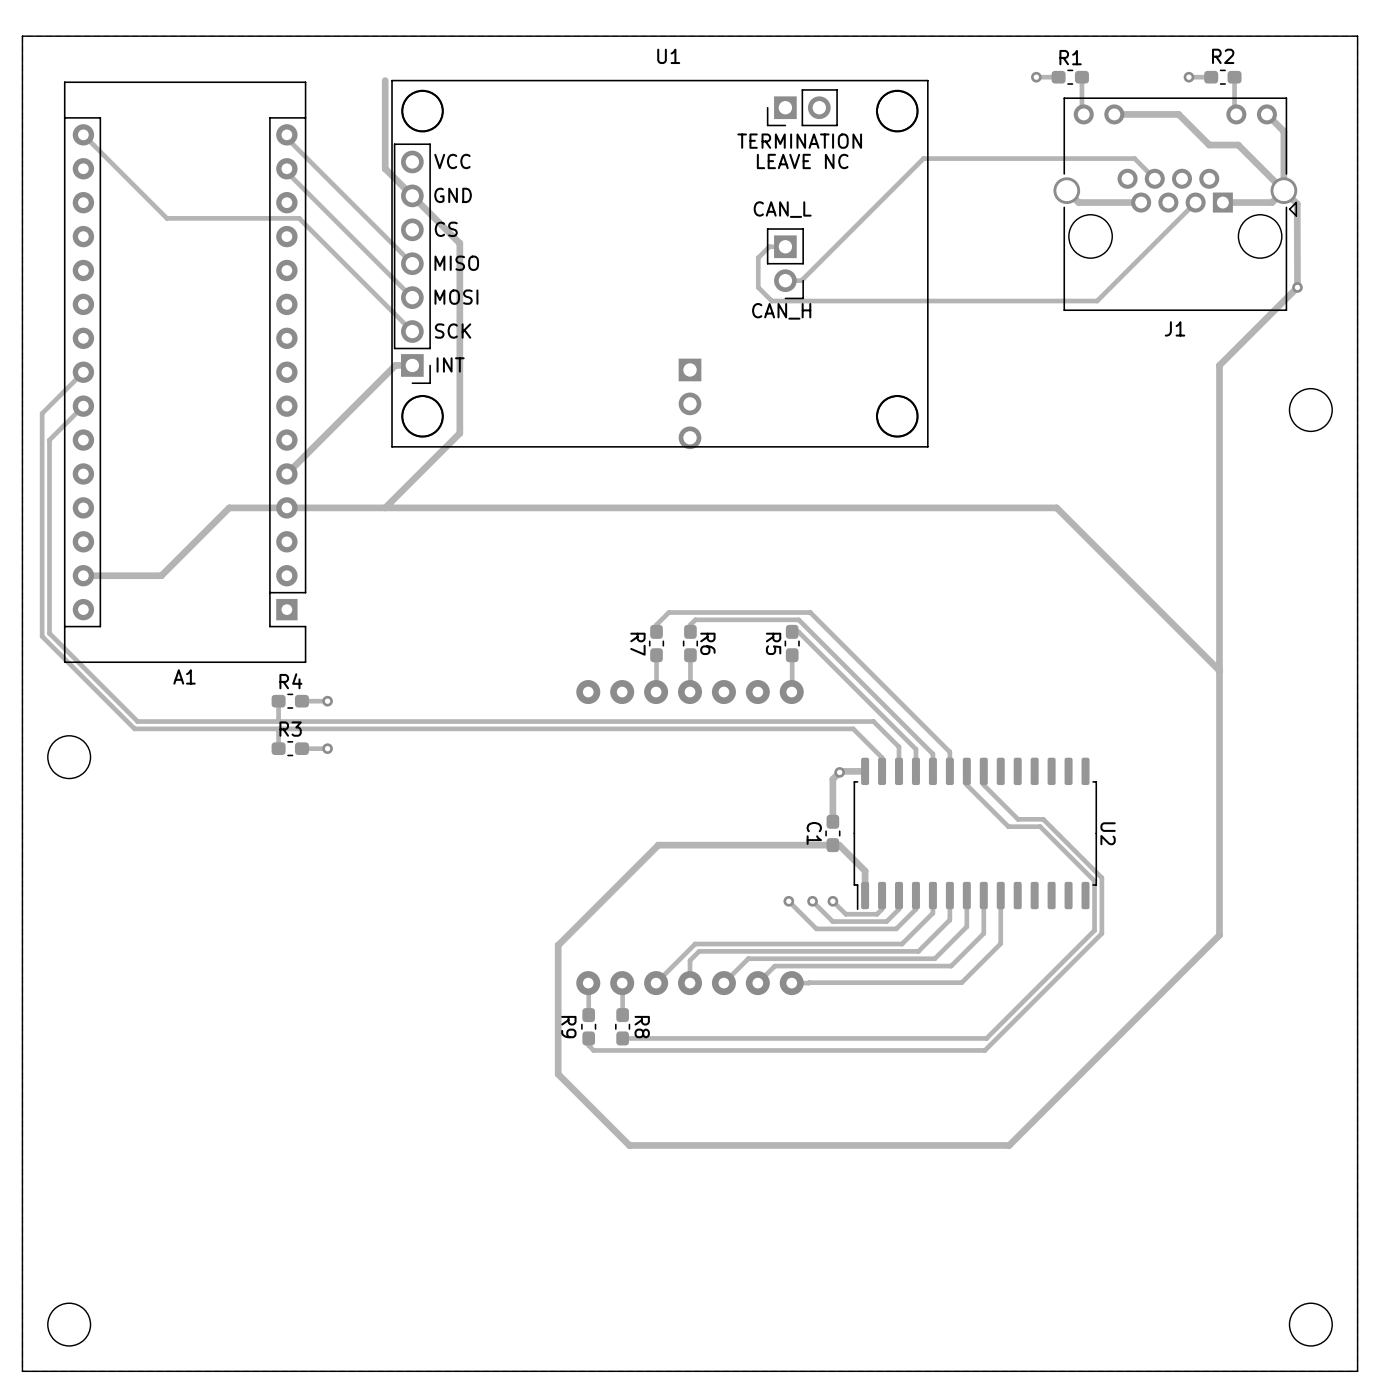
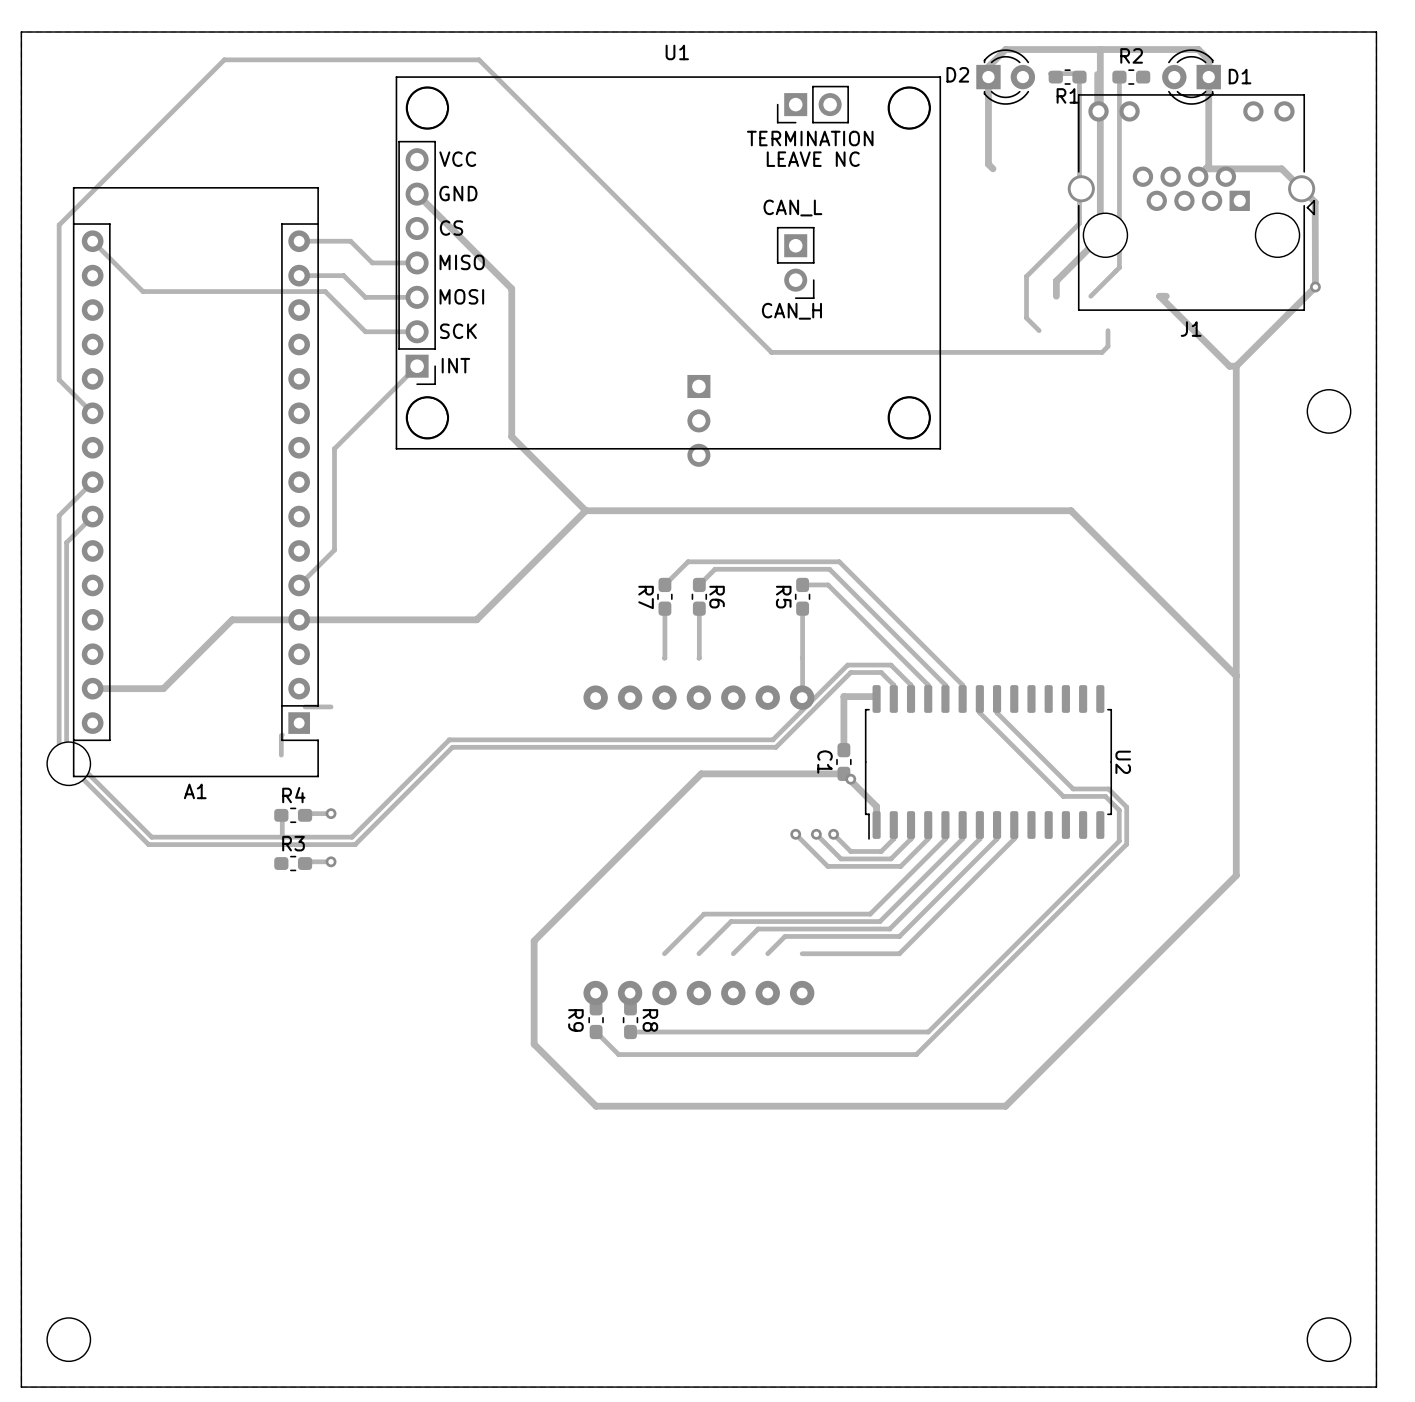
track: none -> (1100, 49) (1100, 237) (1056, 281) (1056, 296)
R1 name position: R1 (1070, 57) -> R1 (1067, 95)
via: (1036, 77) -> none
R1 position: (1070, 77) -> (1067, 77)
via: (1188, 77) -> none
track: (1211, 77) (1188, 77) -> none
R2 position: (1222, 77) -> (1131, 77)
track: (1234, 77) (1234, 112) (1236, 114) -> none
track: (385, 80) (385, 168) (412, 195) -> none
D2: none -> (1005, 77)
track: none -> (1079, 77) (1079, 223) (1026, 276) (1026, 318) (1039, 330)
track: none -> (1119, 77) (1119, 267) (1090, 296)
D1: none -> (1191, 77)
track: (1114, 114) (1178, 114) (1209, 145) (1238, 145) (1264, 171) -> (993, 168) (988, 164) (988, 66) (1005, 49) (1198, 49) (1208, 59) (1208, 165) (1205, 168) (1281, 168)
track: (1266, 114) (1283, 131) (1283, 190) (1272, 202) (1222, 202) -> none
track: (83, 134) (166, 218) (299, 218) (412, 331) -> (92, 241) (142, 291) (325, 291) (365, 331) (417, 331)
track: (286, 134) (286, 138) (412, 263) -> (299, 241) (350, 241) (372, 262) (417, 262)
track: (286, 168) (286, 172) (412, 297) -> (299, 275) (343, 275) (365, 297) (417, 297)
track: (1154, 178) (1134, 158) (923, 158) (801, 280) (785, 280) -> none
track: (1066, 190) (1078, 202) (1141, 202) -> none
track: (1195, 202) (1097, 301) (771, 301) (758, 287) (758, 257) (769, 246) (785, 246) -> none
track: (459, 243) (459, 433) (385, 507) -> (465, 242) (511, 288) (511, 436) (585, 510) (476, 619) (232, 619) (163, 688) (92, 688)
track: none -> (1166, 296) (1159, 296) (1229, 366) (1236, 366)
track: none -> (1108, 330) (1108, 346) (1102, 352) (771, 352) (479, 59) (224, 59) (59, 225) (59, 379) (92, 413)
track: (412, 365) (395, 365) (286, 473) -> (417, 366) (334, 448) (334, 550) (299, 585)
track: (83, 372) (42, 413) (42, 636) (134, 728) (853, 728) (882, 757) (882, 771) -> none
A1 position: (185, 372) -> (195, 482)
part position: (690, 403) -> (698, 420)
track: (83, 406) (49, 440) (49, 633) (137, 721) (873, 721) (899, 746) (899, 771) -> none
track: none -> (92, 482) (59, 515) (59, 755) (148, 844) (355, 844) (452, 747) (775, 747) (850, 672) (881, 672) (893, 685) (893, 698)
track: (578, 507) (229, 507) (161, 575) (83, 575) -> none
track: none -> (92, 516) (66, 542) (66, 752) (151, 837) (352, 837) (449, 739) (772, 739) (847, 665) (890, 665) (911, 685) (911, 698)
track: none -> (664, 584) (688, 561) (839, 561) (962, 685) (962, 698)
track: none -> (699, 584) (715, 569) (829, 569) (945, 685) (945, 698)
track: none -> (802, 584) (828, 584) (928, 685) (928, 698)
track: none -> (802, 608) (802, 658)
track: (656, 624) (668, 612) (810, 612) (949, 752) (949, 771) -> (664, 629) (664, 608)
track: (690, 624) (695, 619) (798, 619) (932, 754) (932, 771) -> (699, 629) (699, 608)
track: none -> (664, 636) (664, 658)
track: none -> (699, 636) (698, 658)
track: (792, 631) (798, 631) (915, 749) (915, 771) -> none
R7 position: (656, 643) -> (664, 596)
R6 position: (690, 643) -> (699, 596)
R5 position: (792, 643) -> (802, 596)
track: (656, 655) (656, 692) -> none
track: (690, 655) (690, 692) -> none
track: none -> (876, 698) (874, 696) (843, 696) (843, 750)
track: none -> (979, 698) (979, 712) (1063, 796) (1105, 796) (1119, 810) (1119, 841) (928, 1032) (630, 1032)
track: none -> (997, 698) (997, 712) (1073, 788) (1108, 788) (1126, 807) (1126, 844) (916, 1054) (618, 1054) (596, 1032)
track: (278, 701) (280, 721) -> none
R4 position: (290, 701) -> (293, 815)
via: (327, 701) -> none
R3 position: (290, 748) -> (293, 863)
track: (327, 748) (301, 748) -> none
via: (327, 748) -> none
track: (865, 771) (840, 771) (832, 779) (832, 821) -> none
track: (966, 771) (966, 785) (1008, 826) (1040, 826) (1094, 880) (1094, 930) (986, 1038) (622, 1038) -> none
track: (983, 771) (983, 785) (1018, 819) (1043, 819) (1101, 877) (1101, 933) (984, 1050) (593, 1050) (588, 1045) (588, 1038) -> none
track: none -> (331, 813) (306, 813) (305, 815)
via: none -> (331, 813)
track: none -> (281, 815) (282, 837)
track: none -> (893, 825) (893, 838) (881, 851) (850, 851) (833, 834)
track: none -> (928, 825) (928, 838) (900, 866) (827, 866) (795, 834)
track: none -> (945, 825) (945, 838) (870, 914) (704, 914) (664, 953)
track: none -> (962, 825) (962, 838) (879, 921) (731, 921) (698, 953)
track: none -> (979, 825) (979, 838) (889, 929) (758, 929) (733, 953)
track: none -> (997, 825) (997, 838) (899, 936) (785, 936) (767, 953)
track: none -> (1014, 825) (1014, 838) (899, 953) (802, 953)
via: none -> (795, 834)
track: none -> (816, 834) (841, 858) (890, 858) (911, 838)
via: none -> (816, 834)
via: none -> (833, 834)
C1 position: (832, 833) -> (843, 762)
U2 position: (975, 833) -> (988, 762)
track: none -> (331, 861) (306, 861) (305, 863)
via: none -> (331, 861)
track: (1219, 867) (1219, 935) (1009, 1145) (629, 1145) (558, 1074) (558, 945) (658, 845) (839, 845) (865, 871) (865, 895) -> (1236, 875) (1005, 1106) (596, 1106) (534, 1044) (534, 940) (701, 773) (843, 773) (876, 806) (876, 825)
track: (882, 895) (882, 909) (877, 914) (845, 914) (832, 901) -> none
track: (899, 895) (899, 909) (886, 921) (832, 921) (812, 901) -> none
track: (915, 895) (915, 909) (896, 928) (816, 928) (788, 901) -> none
track: (932, 895) (932, 913) (902, 944) (695, 944) (656, 983) -> none
track: (949, 895) (949, 919) (918, 951) (699, 951) (690, 960) (690, 983) -> none
track: (966, 895) (966, 926) (934, 958) (748, 958) (723, 983) -> none
track: (983, 895) (983, 933) (951, 966) (774, 966) (757, 983) -> none
track: (1000, 895) (1000, 943) (961, 982) (791, 983) -> none
via: (788, 901) -> none
via: (812, 901) -> none
via: (832, 901) -> none
track: (588, 998) (588, 1015) -> none
track: (622, 998) (622, 1015) -> none
R9 position: (588, 1026) -> (596, 1020)
R8 position: (622, 1026) -> (630, 1020)

